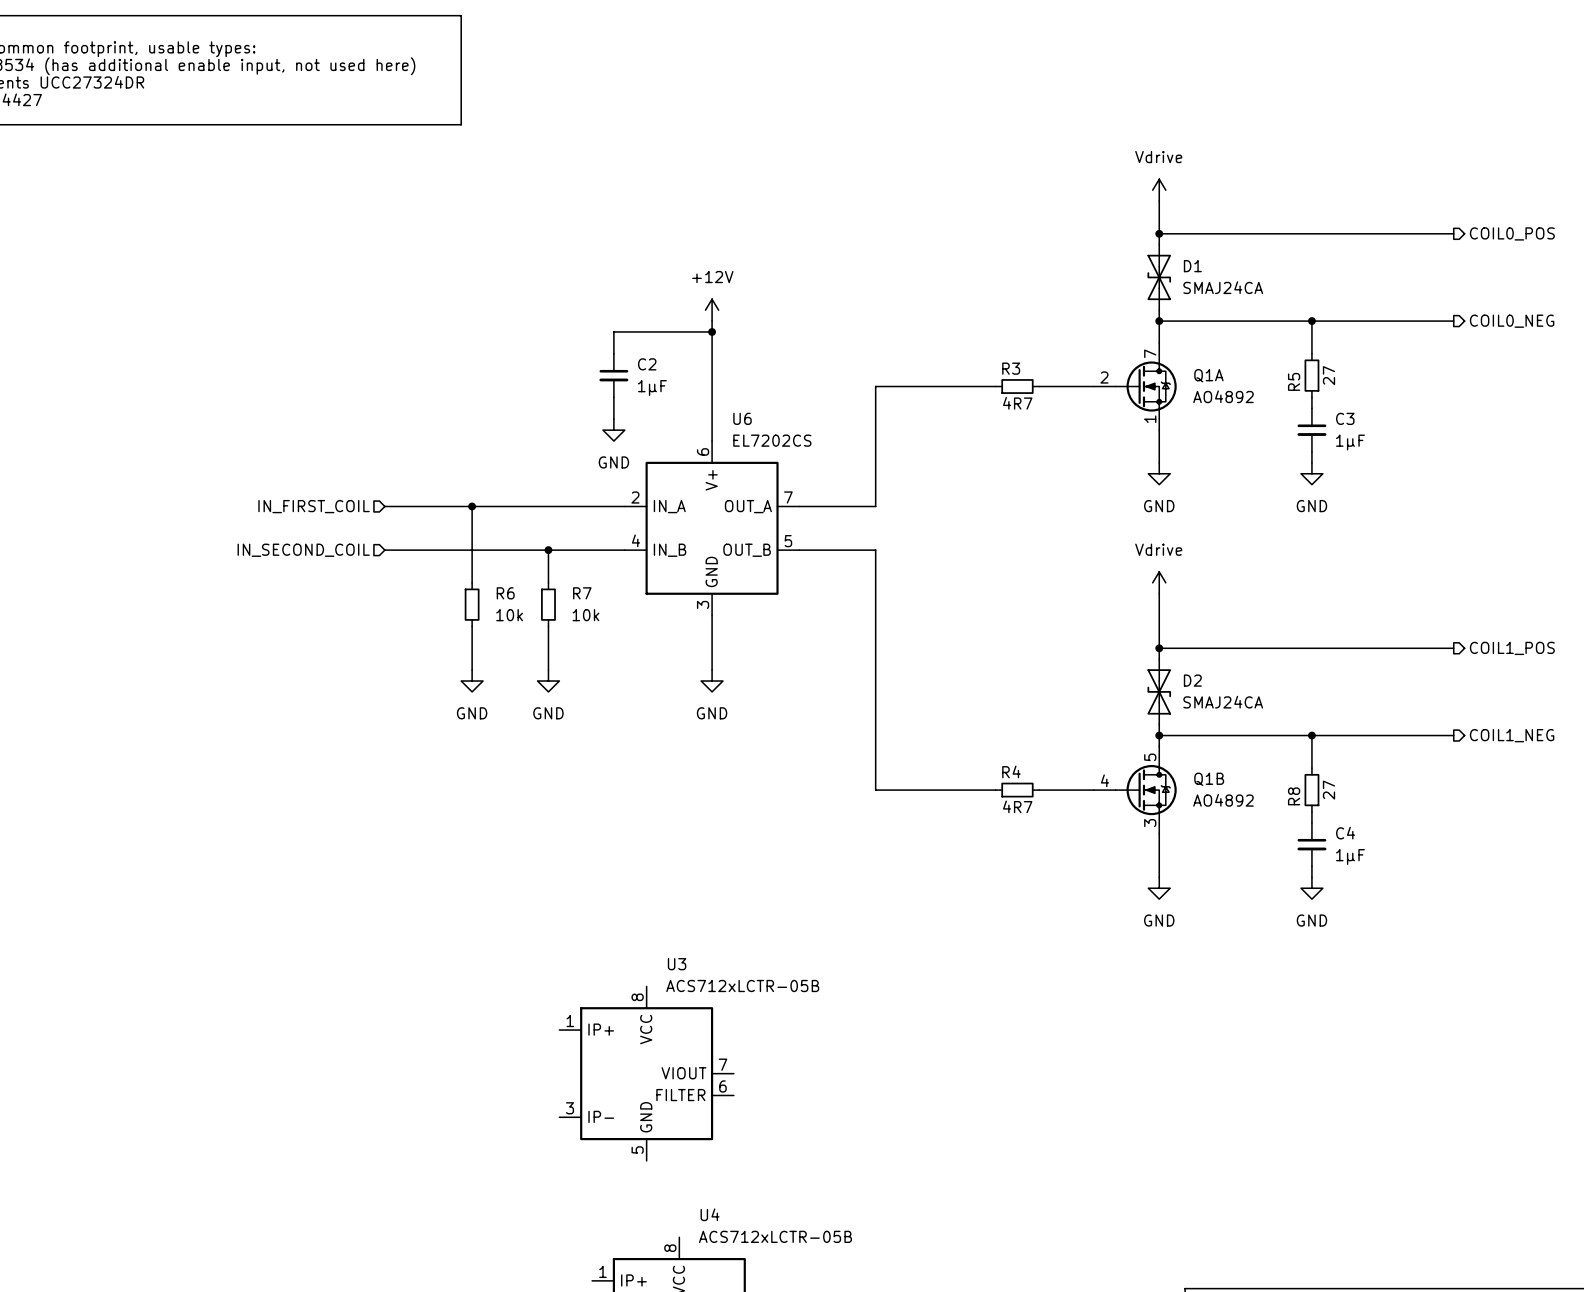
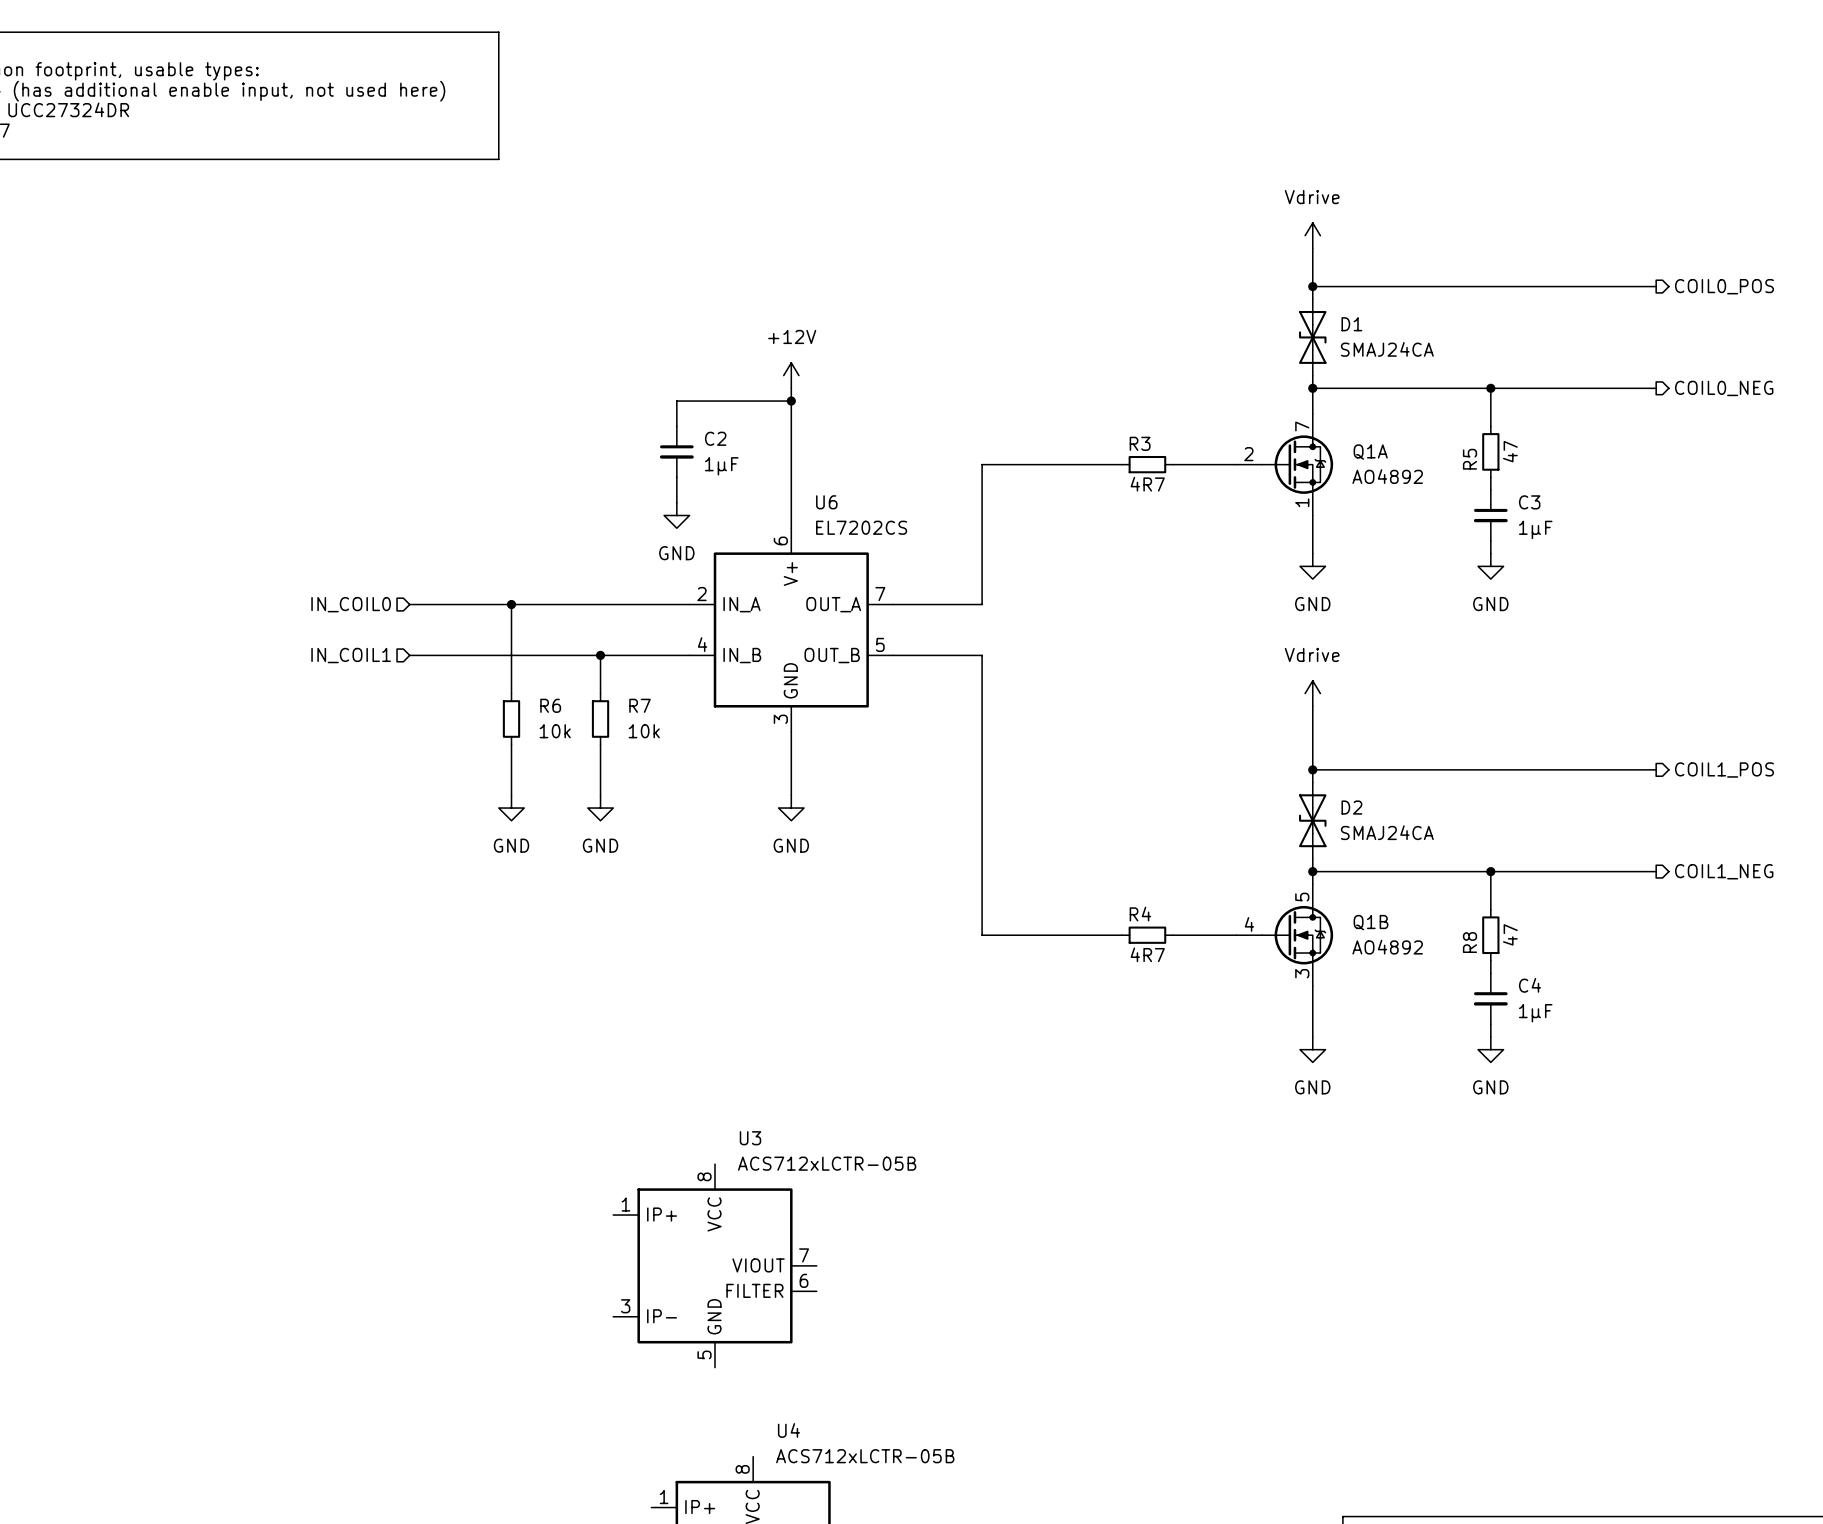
R5 value: 27 (1328, 375) -> 47 (1510, 451)
hierarchical label: IN_FIRST_COIL (314, 506) -> IN_COIL0 (351, 604)
hierarchical label: IN_SECOND_COIL (303, 550) -> IN_COIL1 (351, 655)
R8 value: 27 (1328, 790) -> 47 (1510, 934)

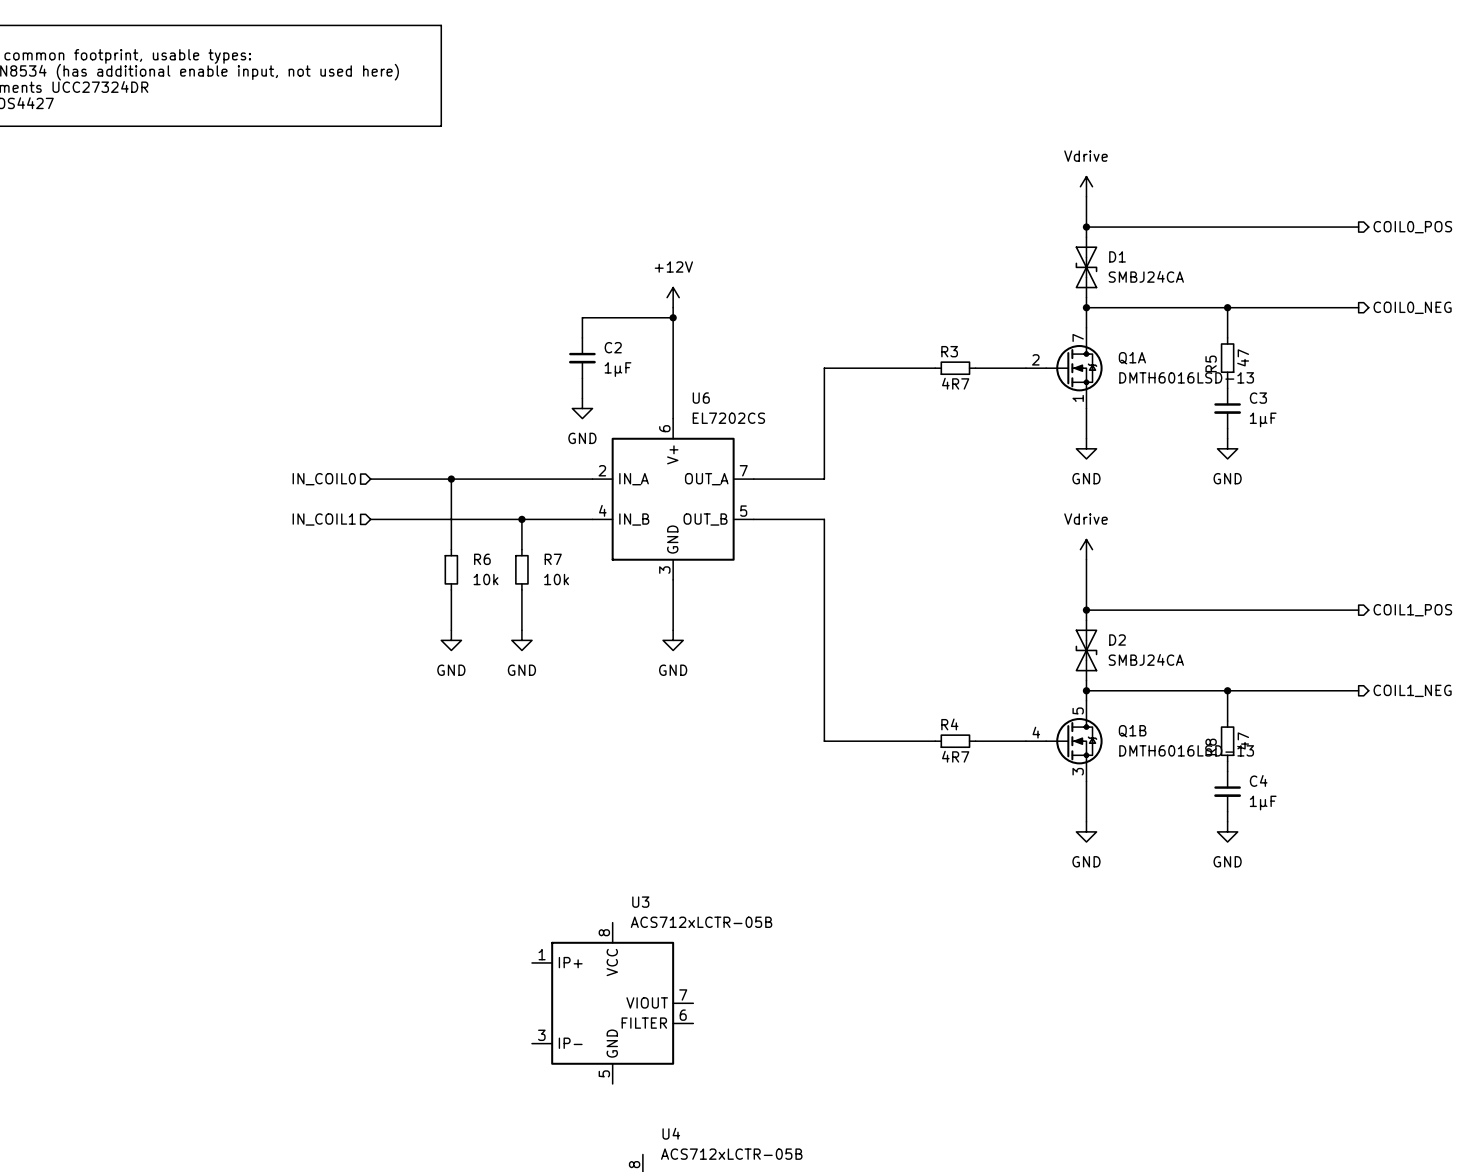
D1 value: SMAJ24CA (1387, 349) -> SMBJ24CA (1146, 276)
Q1A value: AO4892 (1387, 476) -> DMTH6016LSD-13 (1186, 377)
D2 value: SMAJ24CA (1387, 832) -> SMBJ24CA (1146, 659)
Q1B value: AO4892 (1387, 947) -> DMTH6016LSD-13 (1186, 750)

